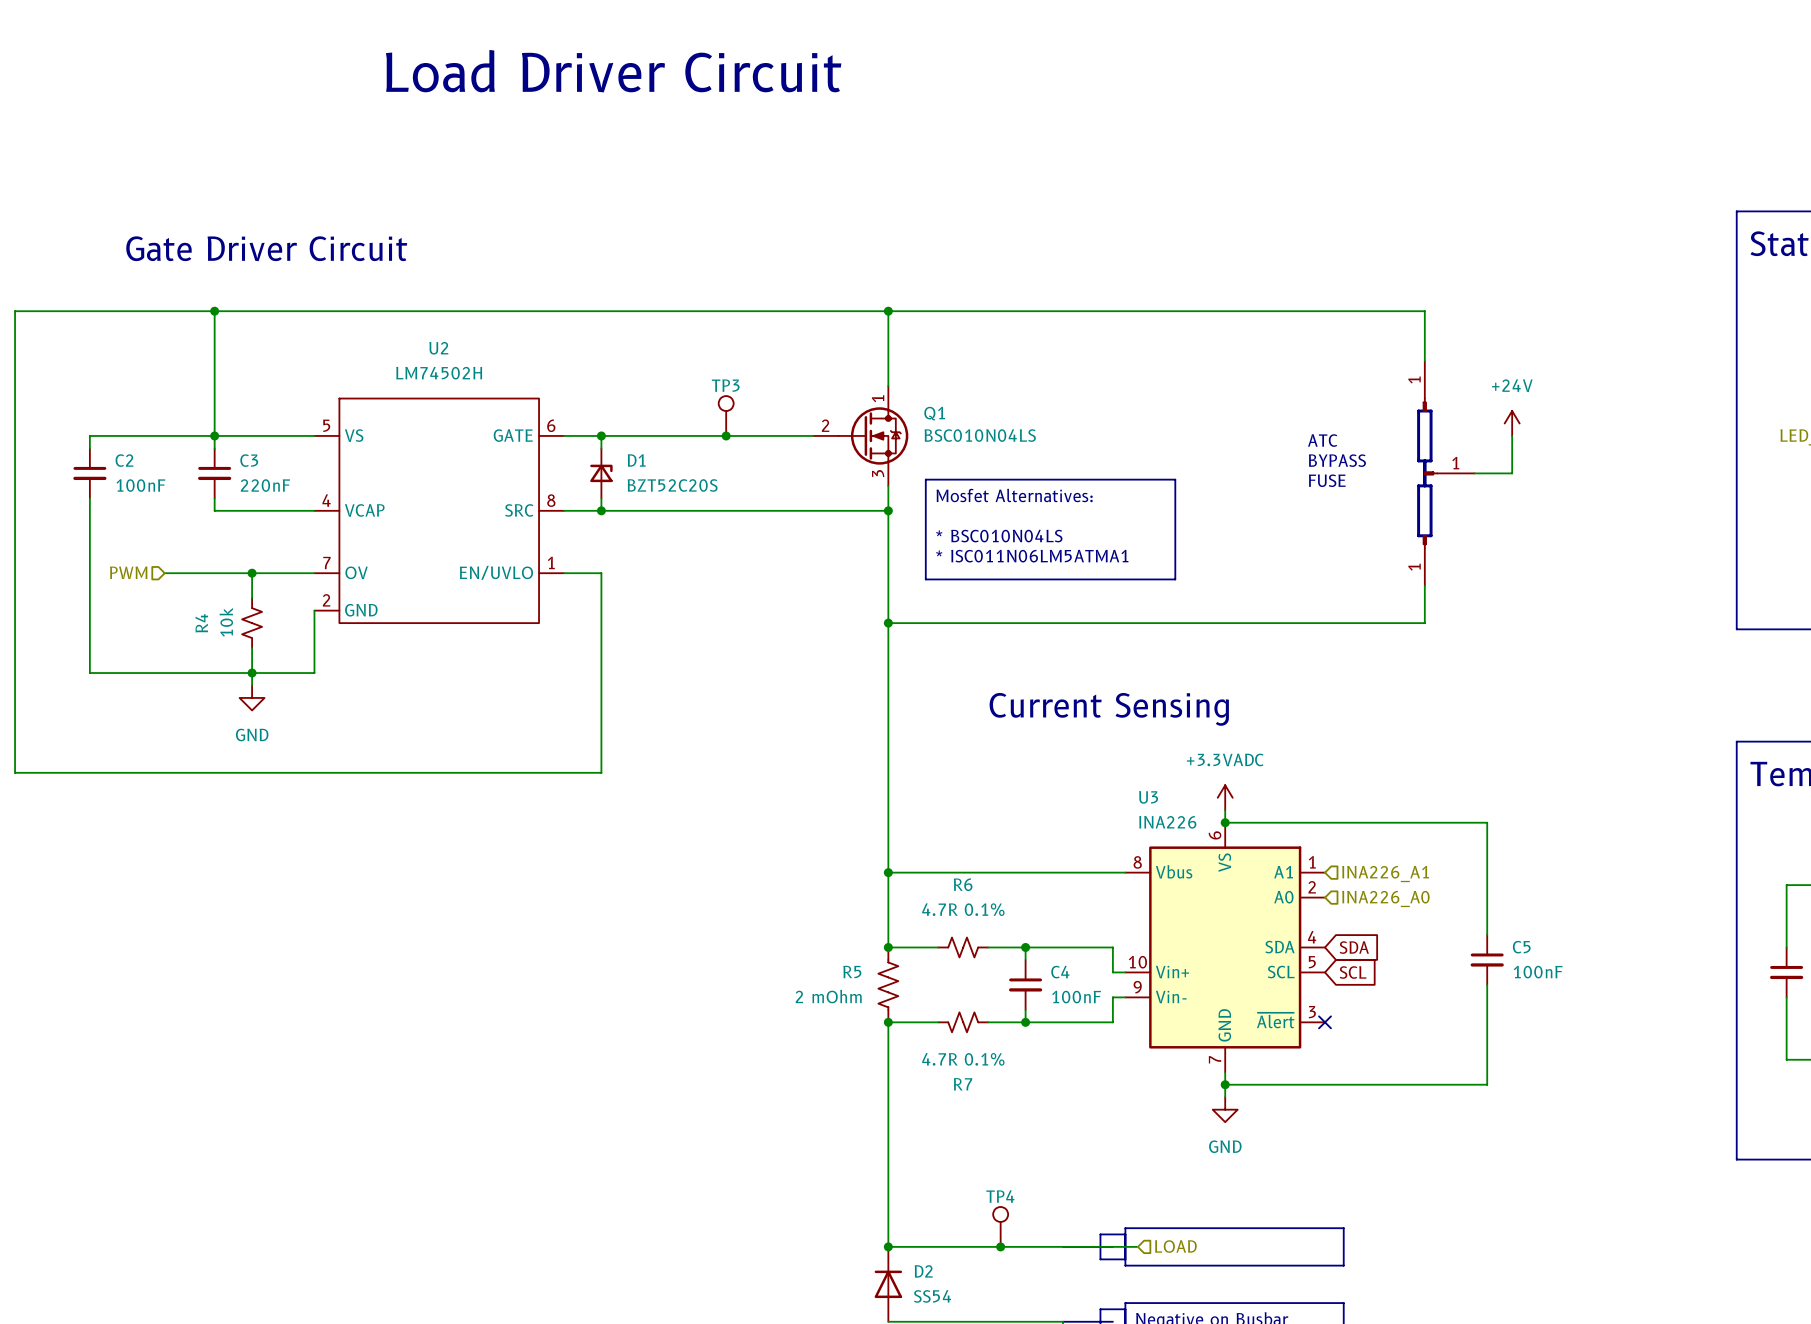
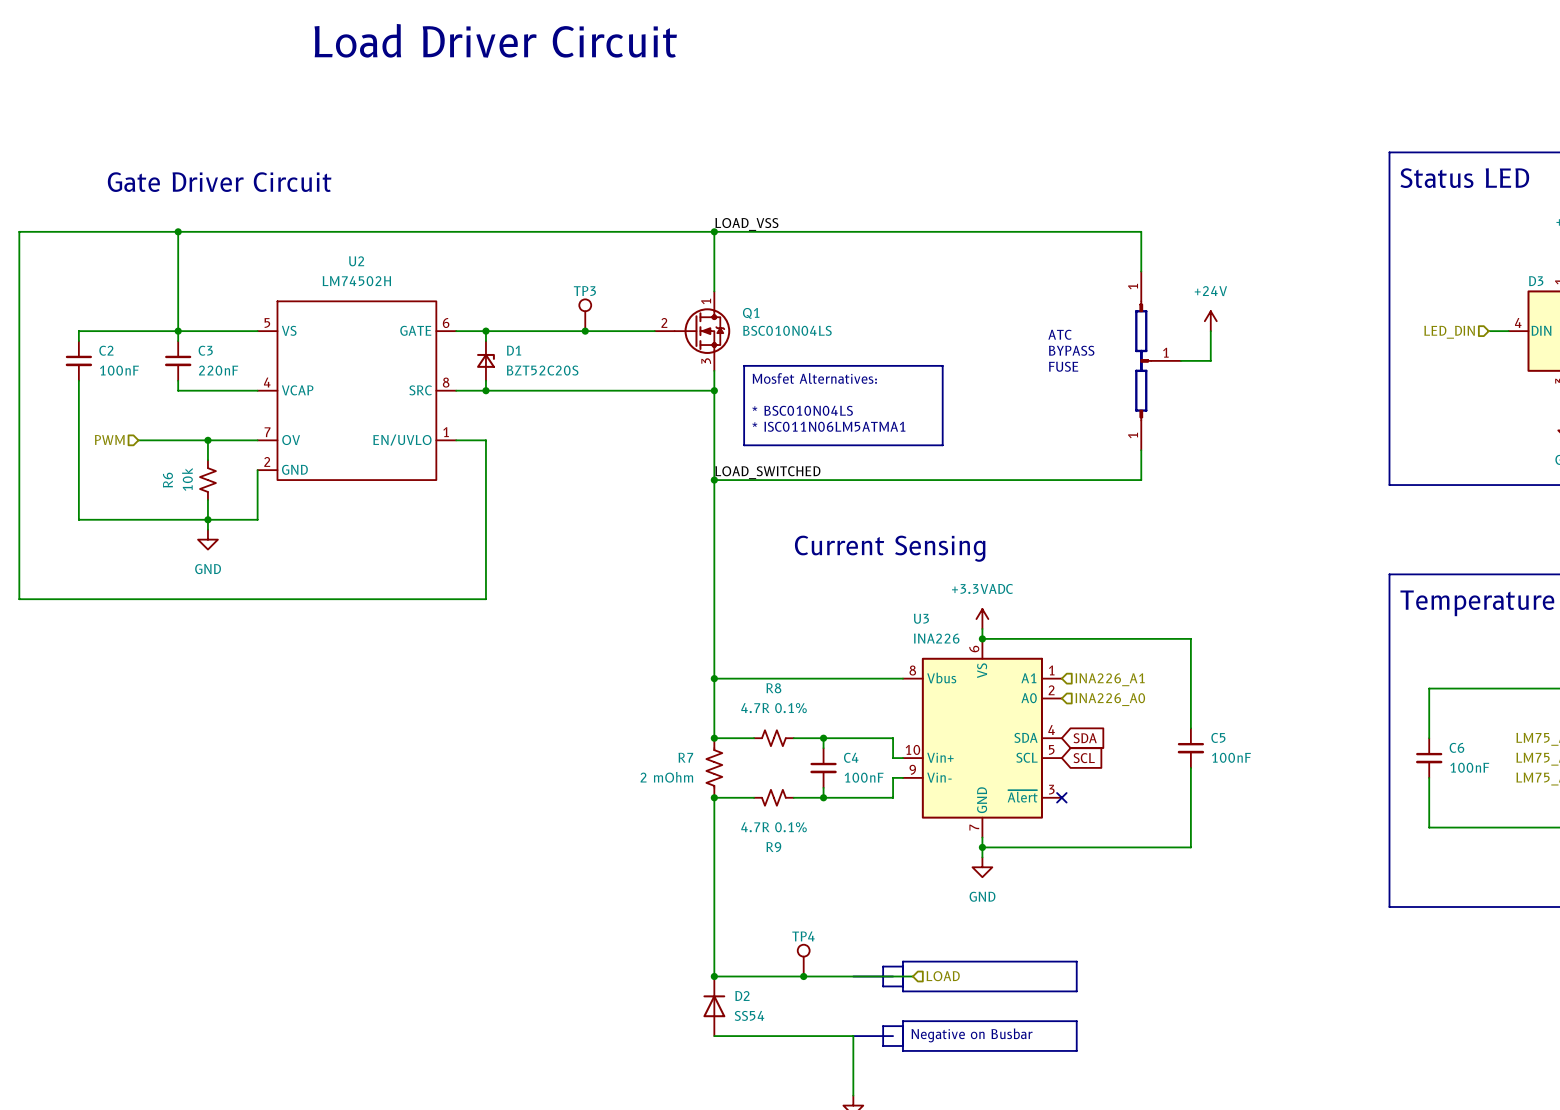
label: none -> LOAD_VSS (746, 224)
label: none -> LOAD_SWITCHED (767, 472)
R4 name: R4 (201, 623) -> R6 (167, 480)
R6 name: R6 (963, 884) -> R8 (773, 688)
R5 name: R5 (852, 972) -> R7 (685, 757)
R7 name: R7 (963, 1084) -> R9 (773, 847)

